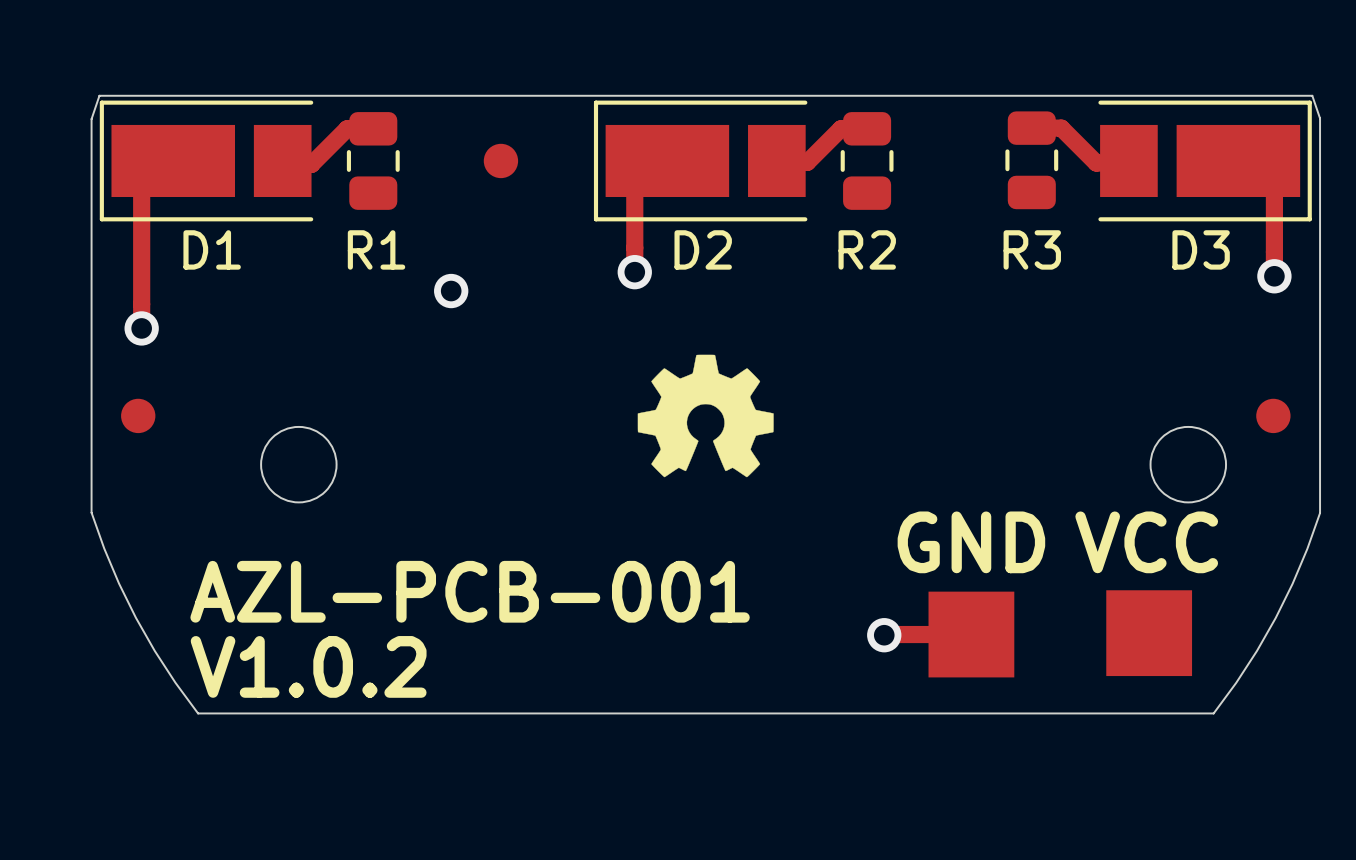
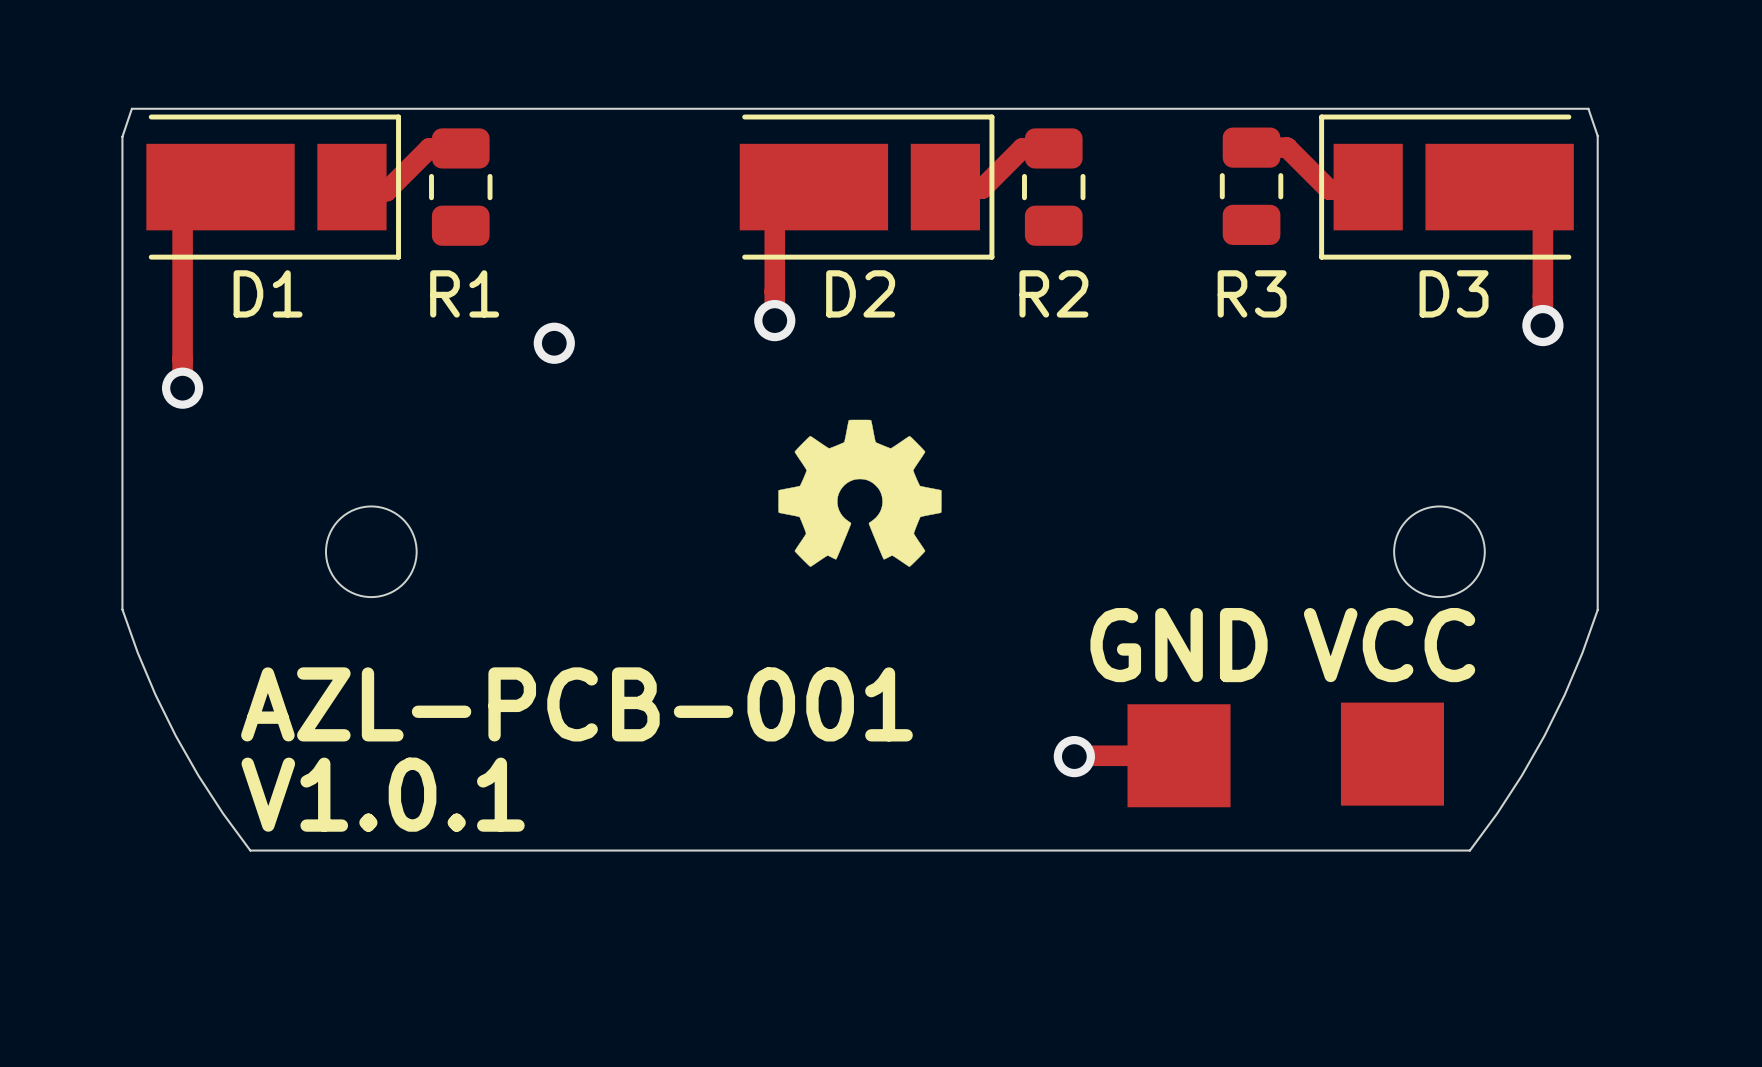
D1 footprint: [99, 100, 314, 222] -> [146, 114, 402, 260]
D2 footprint: [593, 100, 808, 222] -> [739, 114, 995, 260]
D3 footprint: [1098, 100, 1312, 222] -> [1319, 114, 1574, 260]
part: (500, 160) -> none
part: (138, 415) -> none
part: (1273, 415) -> none
text: V1.0.2 (308, 666) -> V1.0.1 (383, 794)

